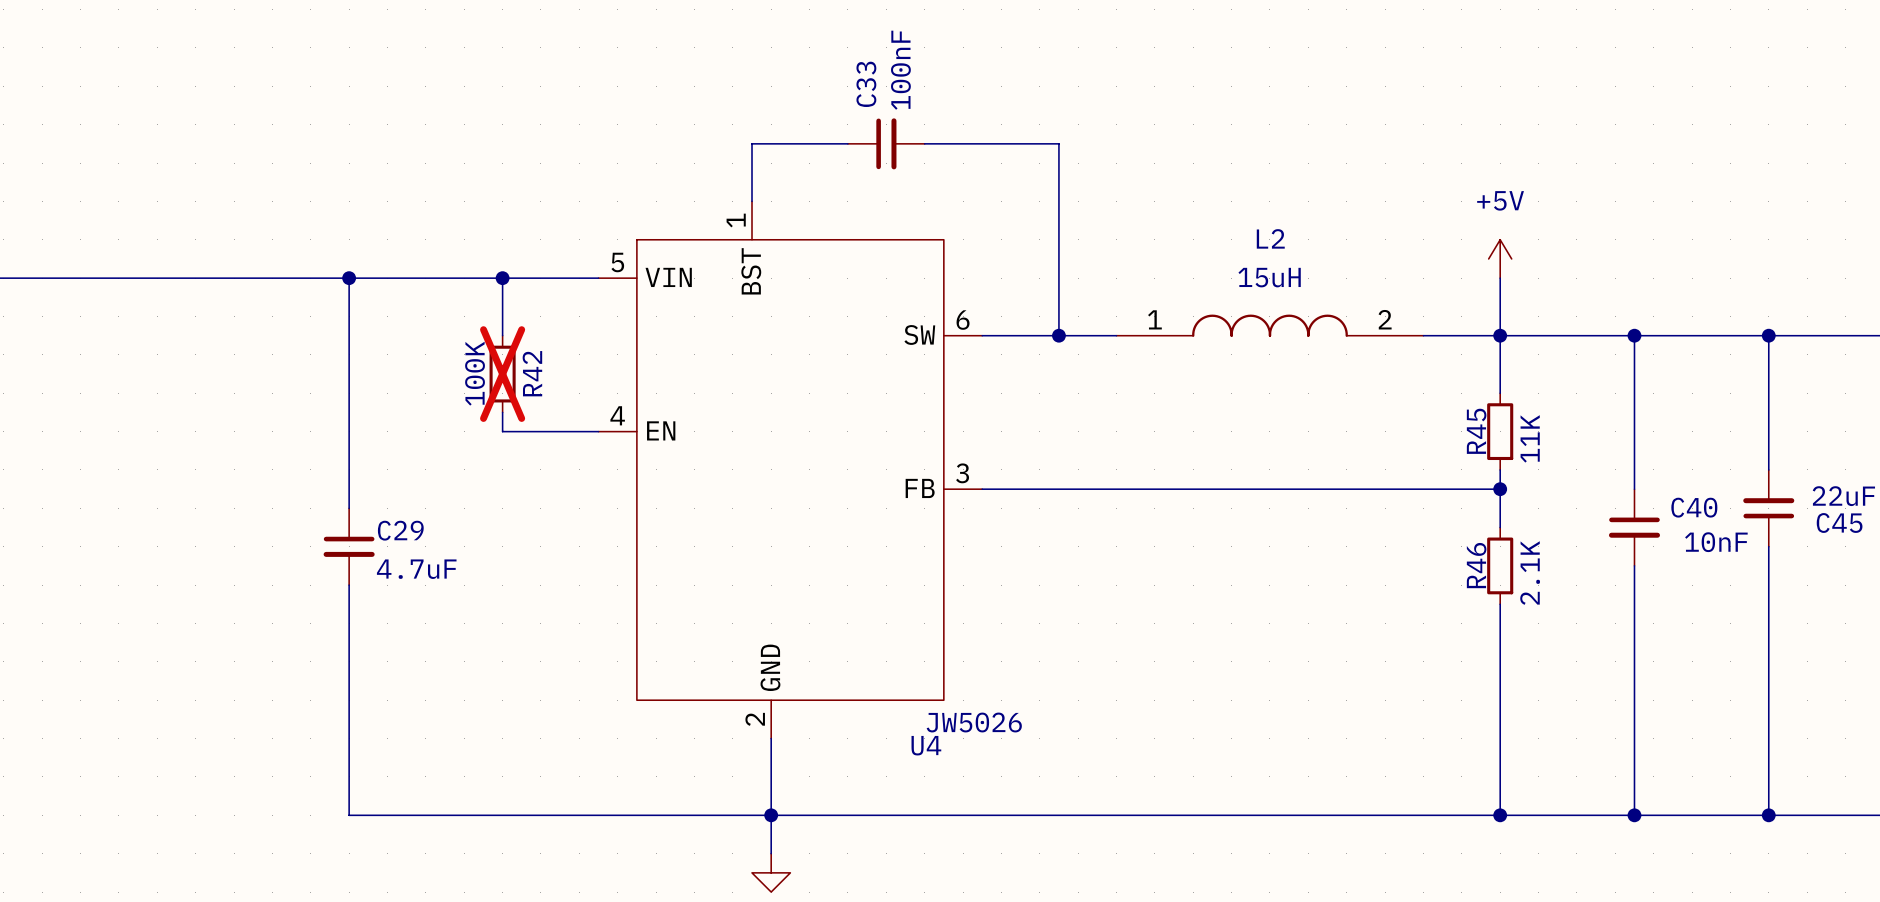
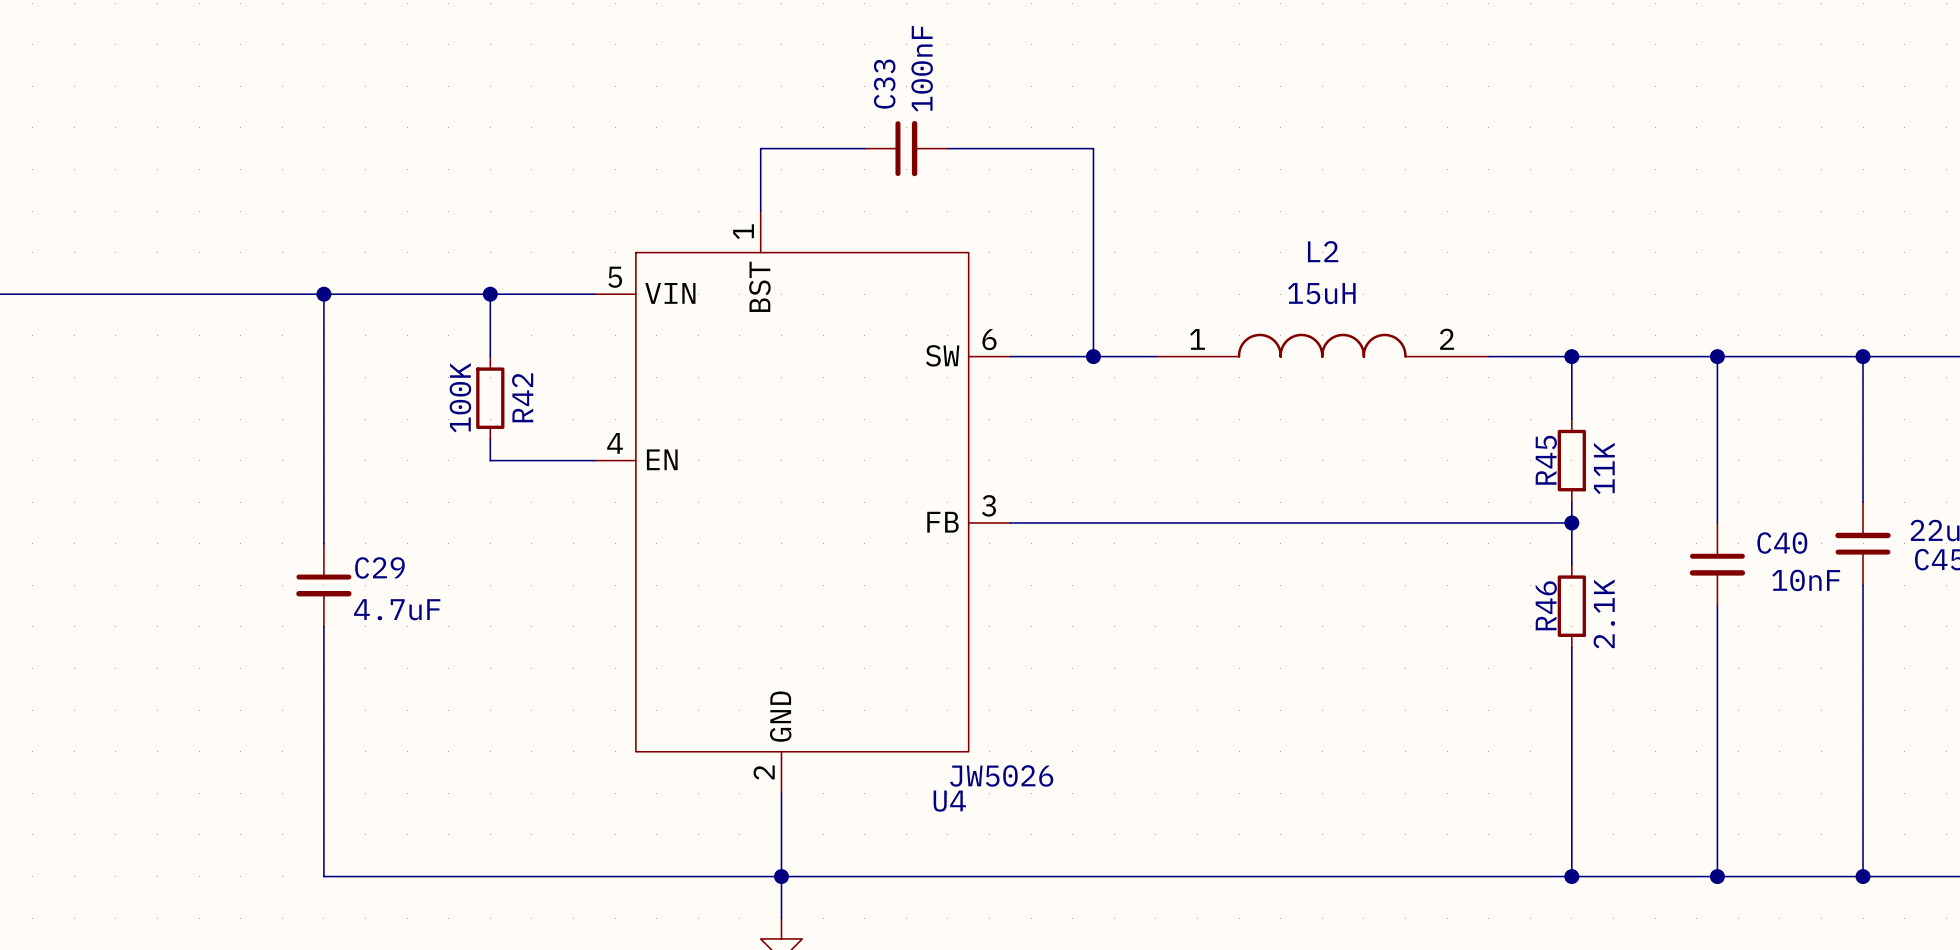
power symbol: +5V (1500, 258) -> none
wire: (1500, 278) (1500, 335) -> none
R42 do-not-place cross: (502, 374) -> none

